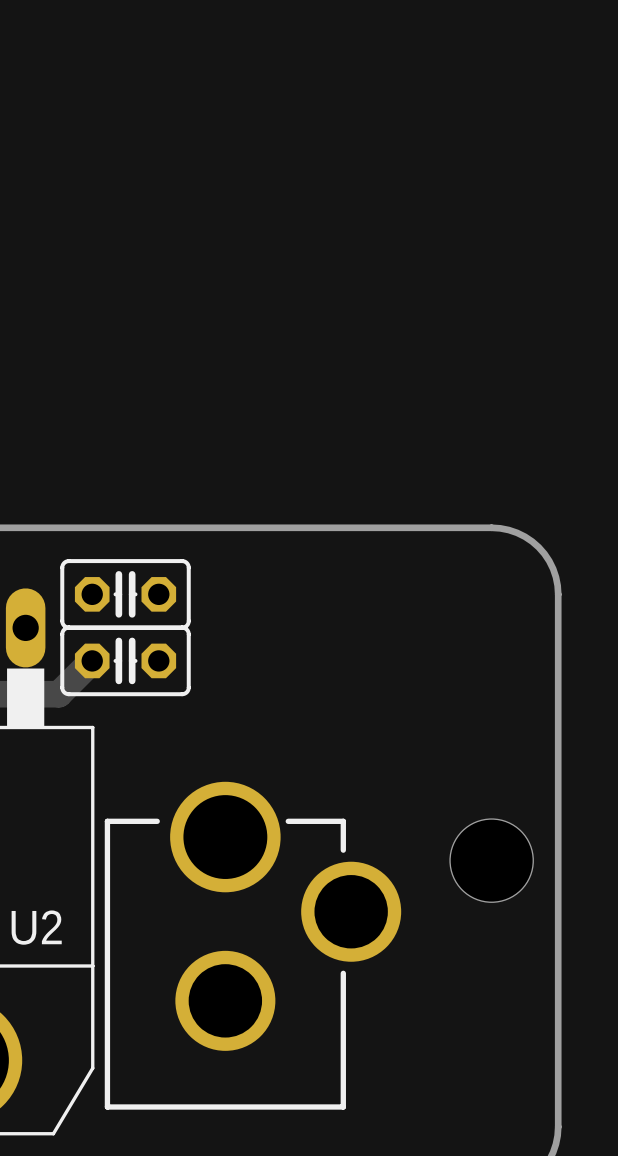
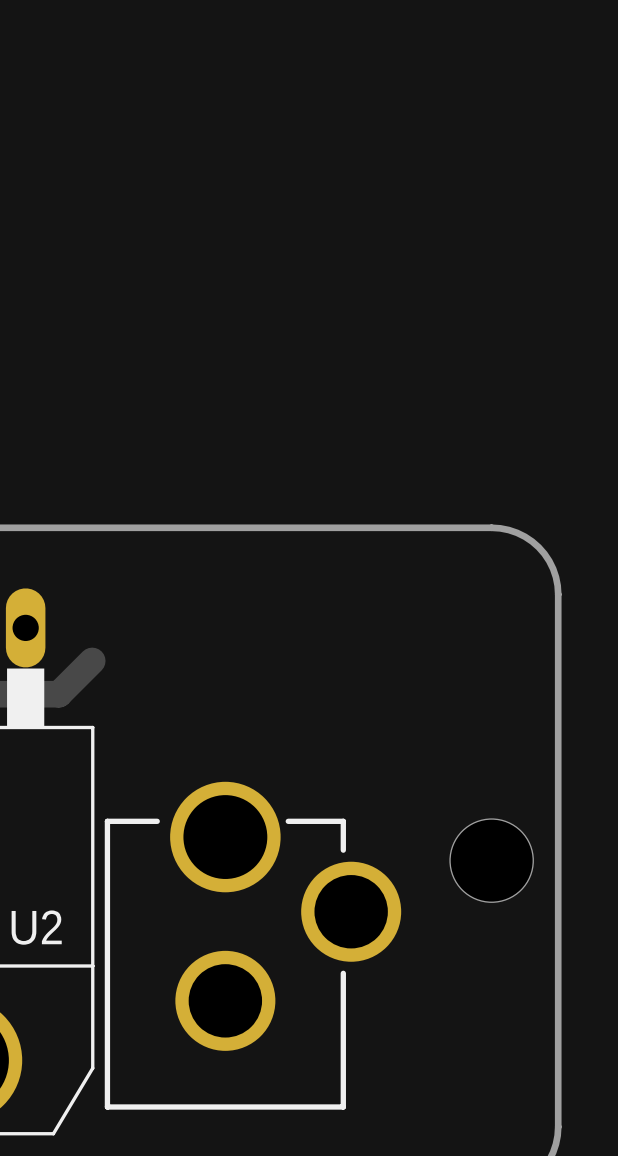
part: (125, 594) -> none
part: (125, 660) -> none

